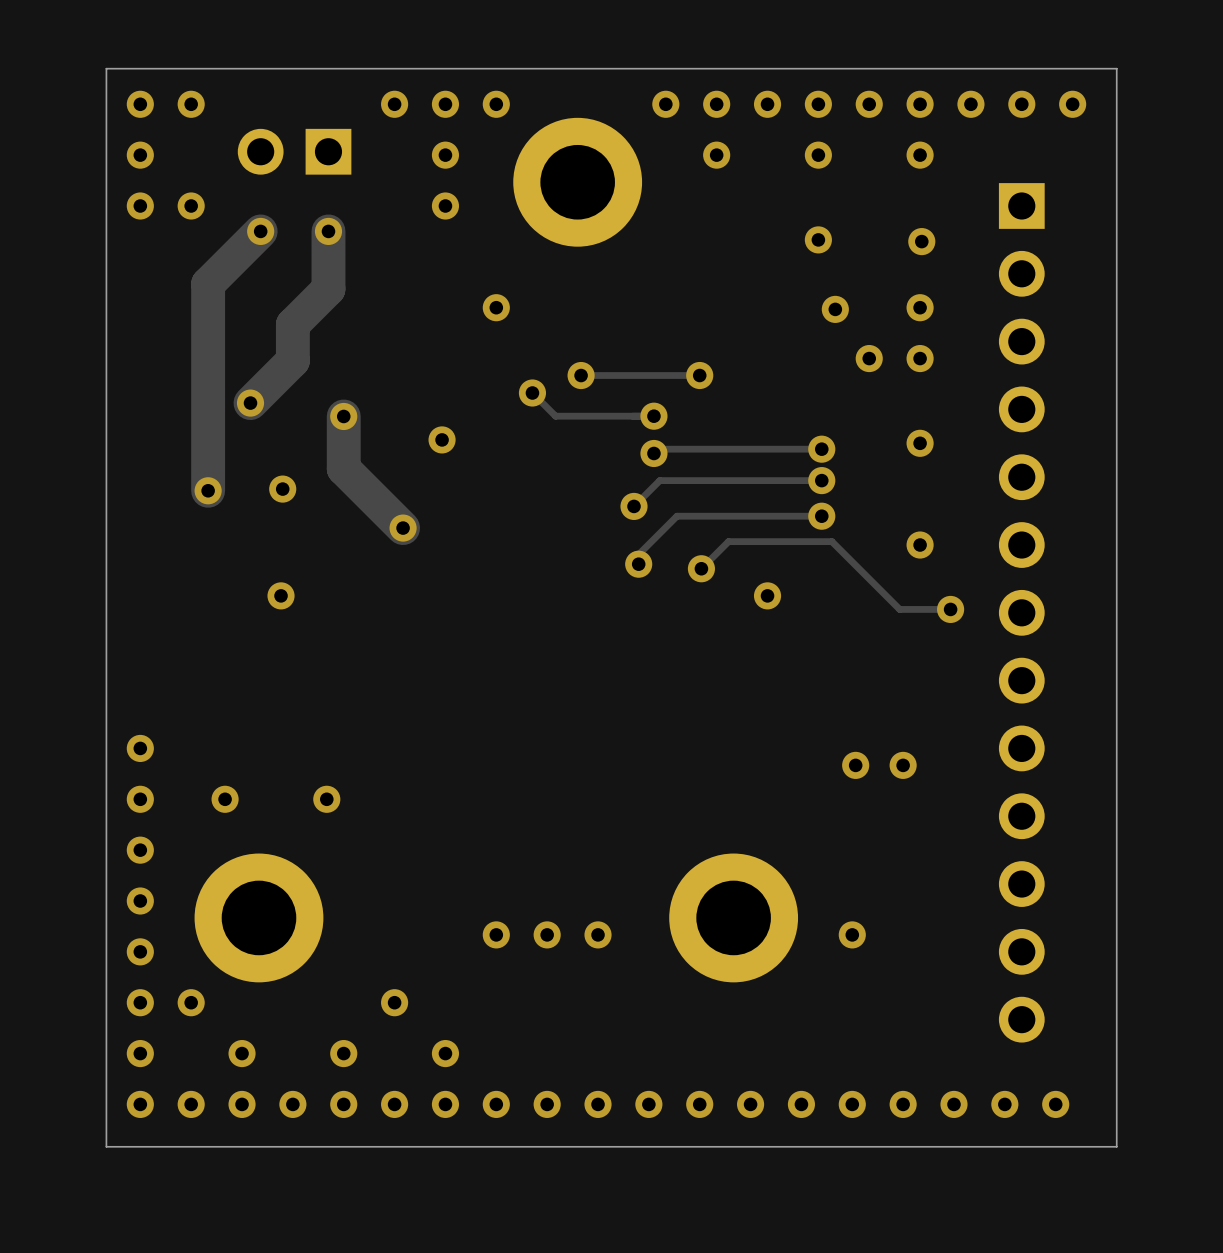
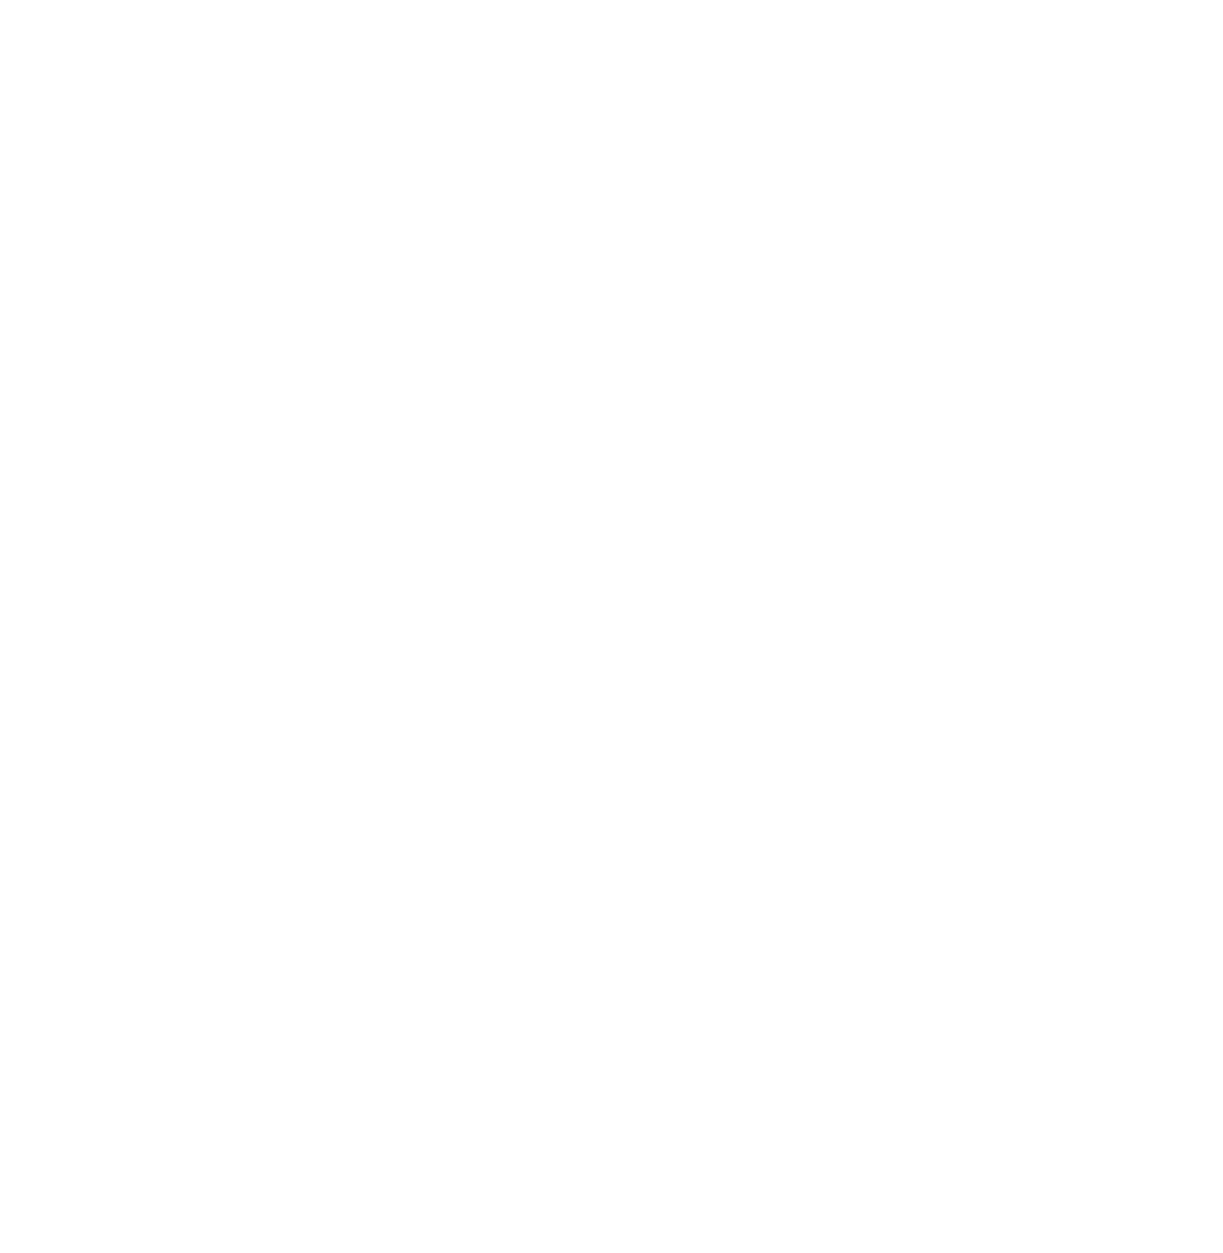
board edge: (1116, 68) (106, 68) (106, 1146) (1116, 1146) (1116, 68) -> none
via: (140, 104) -> none
via: (191, 104) -> none
via: (394, 104) -> none
via: (445, 104) -> none
via: (496, 104) -> none
via: (665, 104) -> none
via: (716, 104) -> none
via: (767, 104) -> none
via: (818, 104) -> none
via: (869, 104) -> none
via: (920, 104) -> none
via: (970, 104) -> none
via: (1021, 104) -> none
via: (1072, 104) -> none
part: (294, 151) -> none
via: (140, 155) -> none
via: (445, 155) -> none
via: (716, 155) -> none
via: (818, 155) -> none
via: (920, 155) -> none
part: (577, 182) -> none
via: (140, 205) -> none
via: (191, 205) -> none
via: (445, 205) -> none
track: (260, 231) (208, 283) (208, 490) -> none
via: (260, 231) -> none
track: (328, 231) (328, 289) (292, 324) (292, 360) (250, 403) -> none
via: (328, 231) -> none
via: (818, 239) -> none
via: (921, 241) -> none
via: (496, 307) -> none
via: (920, 307) -> none
via: (835, 309) -> none
via: (869, 358) -> none
via: (920, 358) -> none
via: (581, 375) -> none
track: (699, 375) (581, 375) -> none
via: (699, 375) -> none
track: (532, 393) (555, 416) (653, 416) -> none
via: (532, 393) -> none
via: (250, 403) -> none
track: (343, 416) (343, 468) (403, 528) -> none
via: (343, 416) -> none
via: (653, 416) -> none
via: (442, 439) -> none
via: (920, 443) -> none
track: (821, 449) (658, 449) (653, 453) -> none
via: (821, 449) -> none
via: (653, 453) -> none
track: (821, 480) (659, 480) (634, 506) -> none
via: (821, 480) -> none
via: (282, 489) -> none
via: (208, 490) -> none
via: (634, 506) -> none
track: (821, 516) (676, 516) (638, 554) (638, 564) -> none
via: (821, 516) -> none
via: (403, 528) -> none
via: (920, 545) -> none
via: (638, 564) -> none
track: (701, 568) (728, 541) (831, 541) (899, 609) (950, 609) -> none
via: (701, 568) -> none
via: (281, 595) -> none
via: (767, 595) -> none
via: (950, 609) -> none
part: (1021, 612) -> none
via: (140, 748) -> none
via: (855, 765) -> none
via: (903, 765) -> none
via: (140, 799) -> none
via: (225, 799) -> none
via: (326, 799) -> none
via: (140, 850) -> none
via: (140, 901) -> none
part: (258, 917) -> none
part: (733, 917) -> none
via: (496, 934) -> none
via: (547, 934) -> none
via: (598, 934) -> none
via: (852, 934) -> none
via: (140, 951) -> none
via: (140, 1002) -> none
via: (191, 1002) -> none
via: (394, 1002) -> none
via: (140, 1053) -> none
via: (242, 1053) -> none
via: (343, 1053) -> none
via: (445, 1053) -> none
via: (140, 1104) -> none
via: (191, 1104) -> none
via: (242, 1104) -> none
via: (292, 1104) -> none
via: (343, 1104) -> none
via: (394, 1104) -> none
via: (445, 1104) -> none
via: (496, 1104) -> none
via: (547, 1104) -> none
via: (598, 1104) -> none
via: (648, 1104) -> none
via: (699, 1104) -> none
via: (750, 1104) -> none
via: (801, 1104) -> none
via: (852, 1104) -> none
via: (903, 1104) -> none
via: (953, 1104) -> none
via: (1004, 1104) -> none
via: (1055, 1104) -> none

